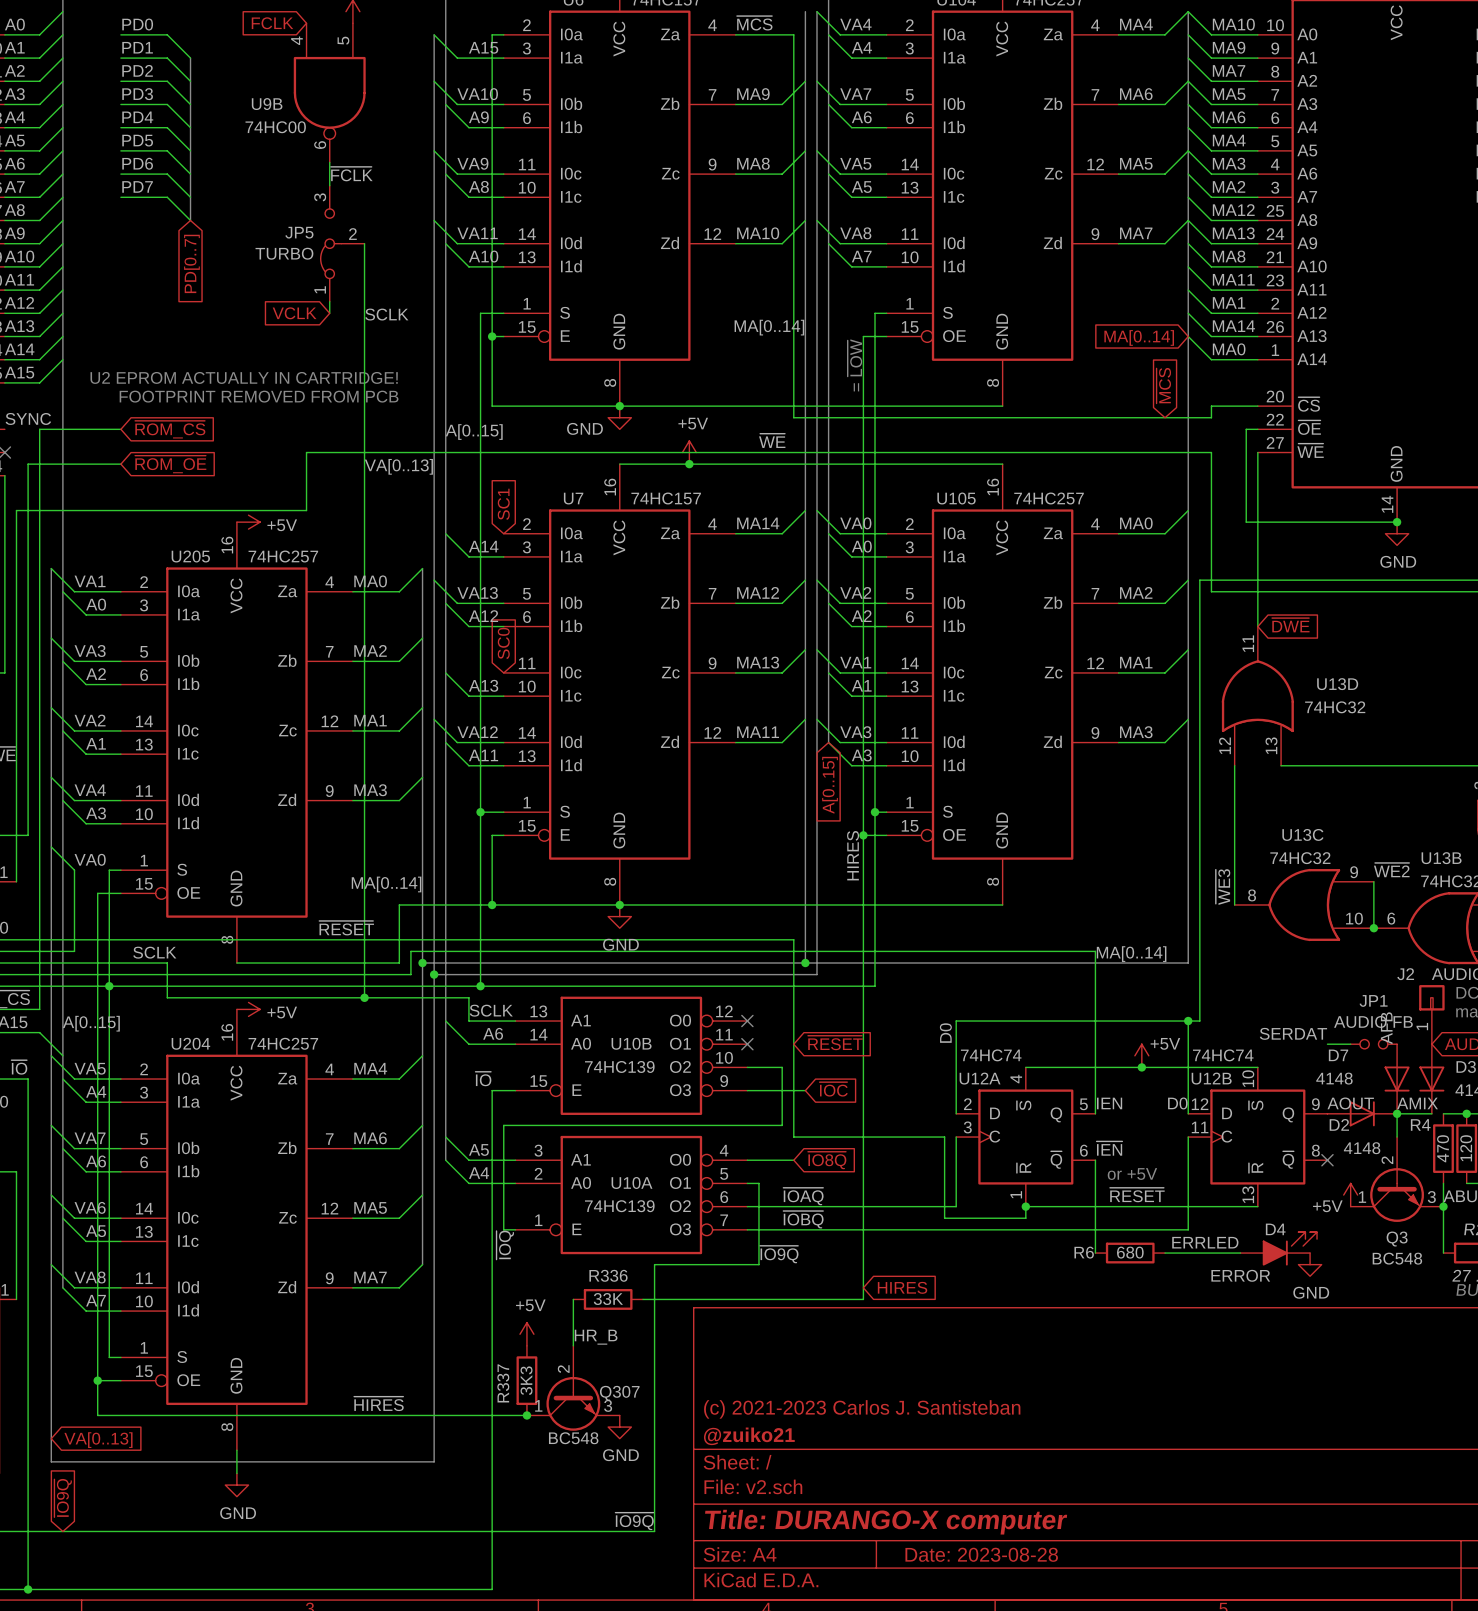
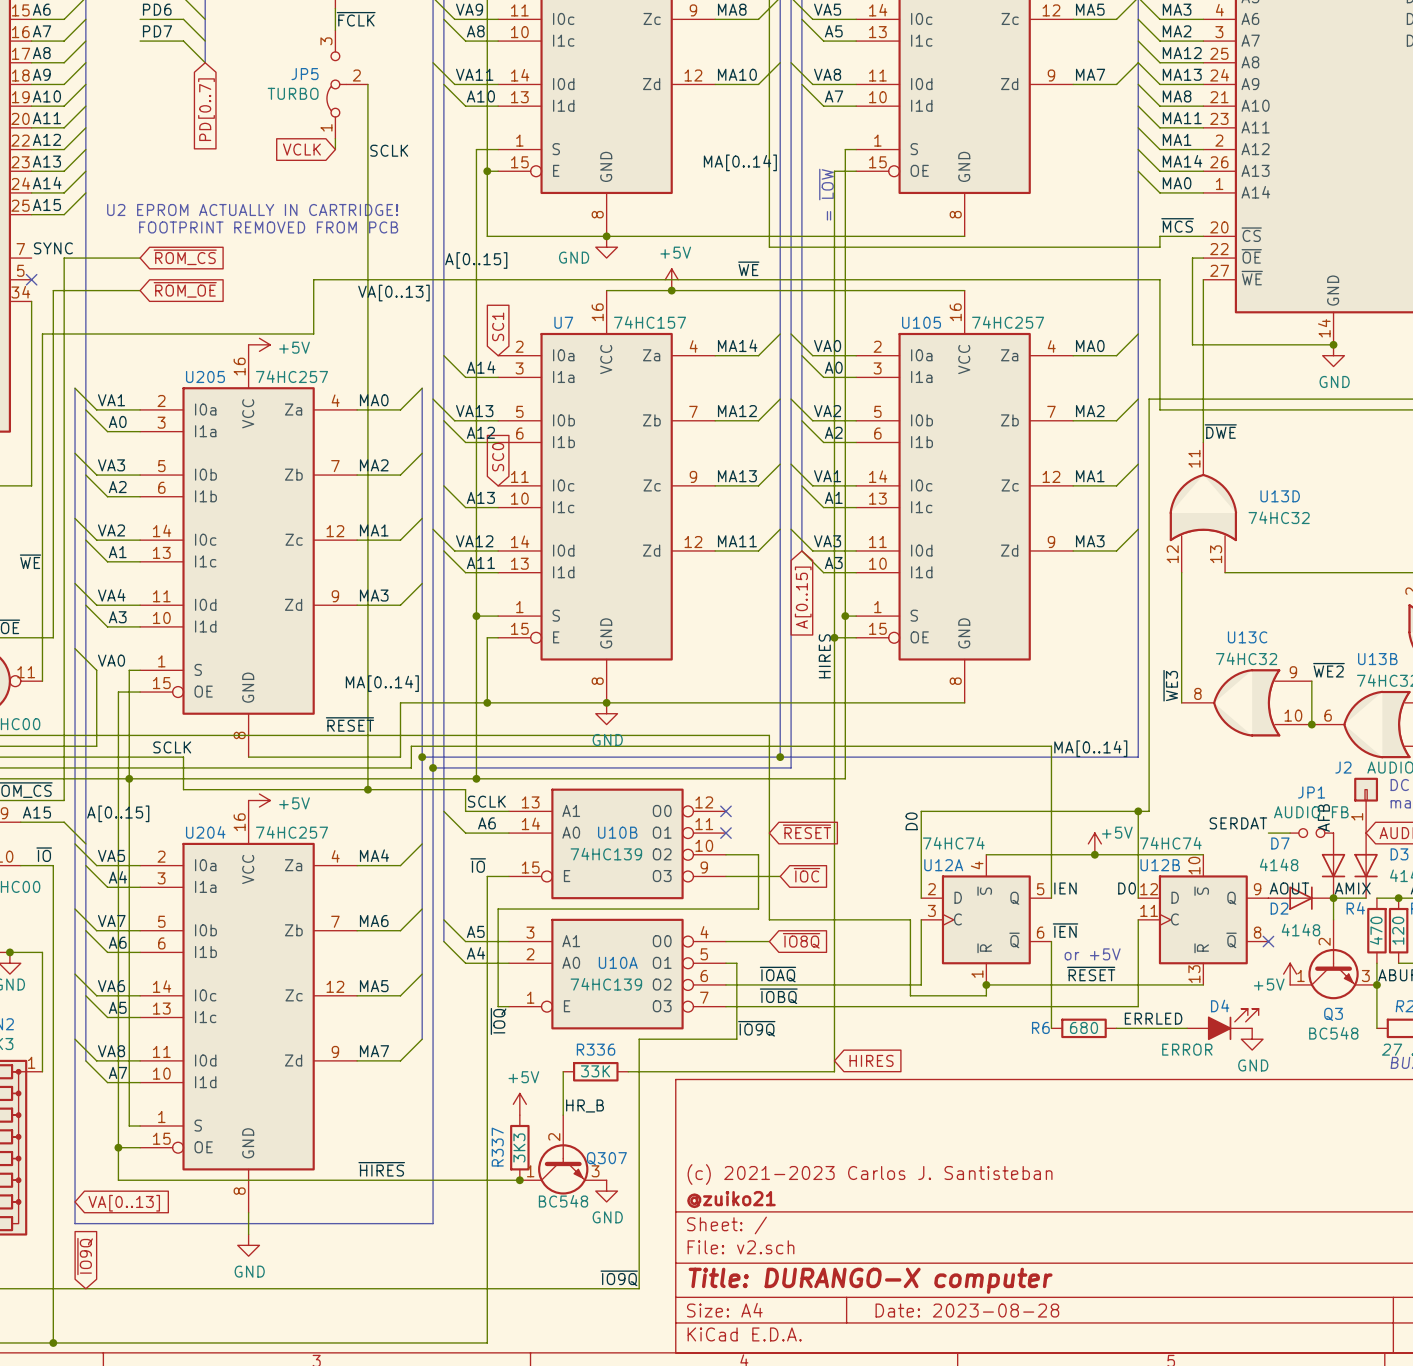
global label: MA[0..14] (1139, 337) -> none
global label: ~{MCS} (1163, 385) -> none
label: none -> ~{MCS} (1177, 225)
label: none -> ~{DWE} (1220, 431)
global label: ~{DWE} (1290, 625) -> none

